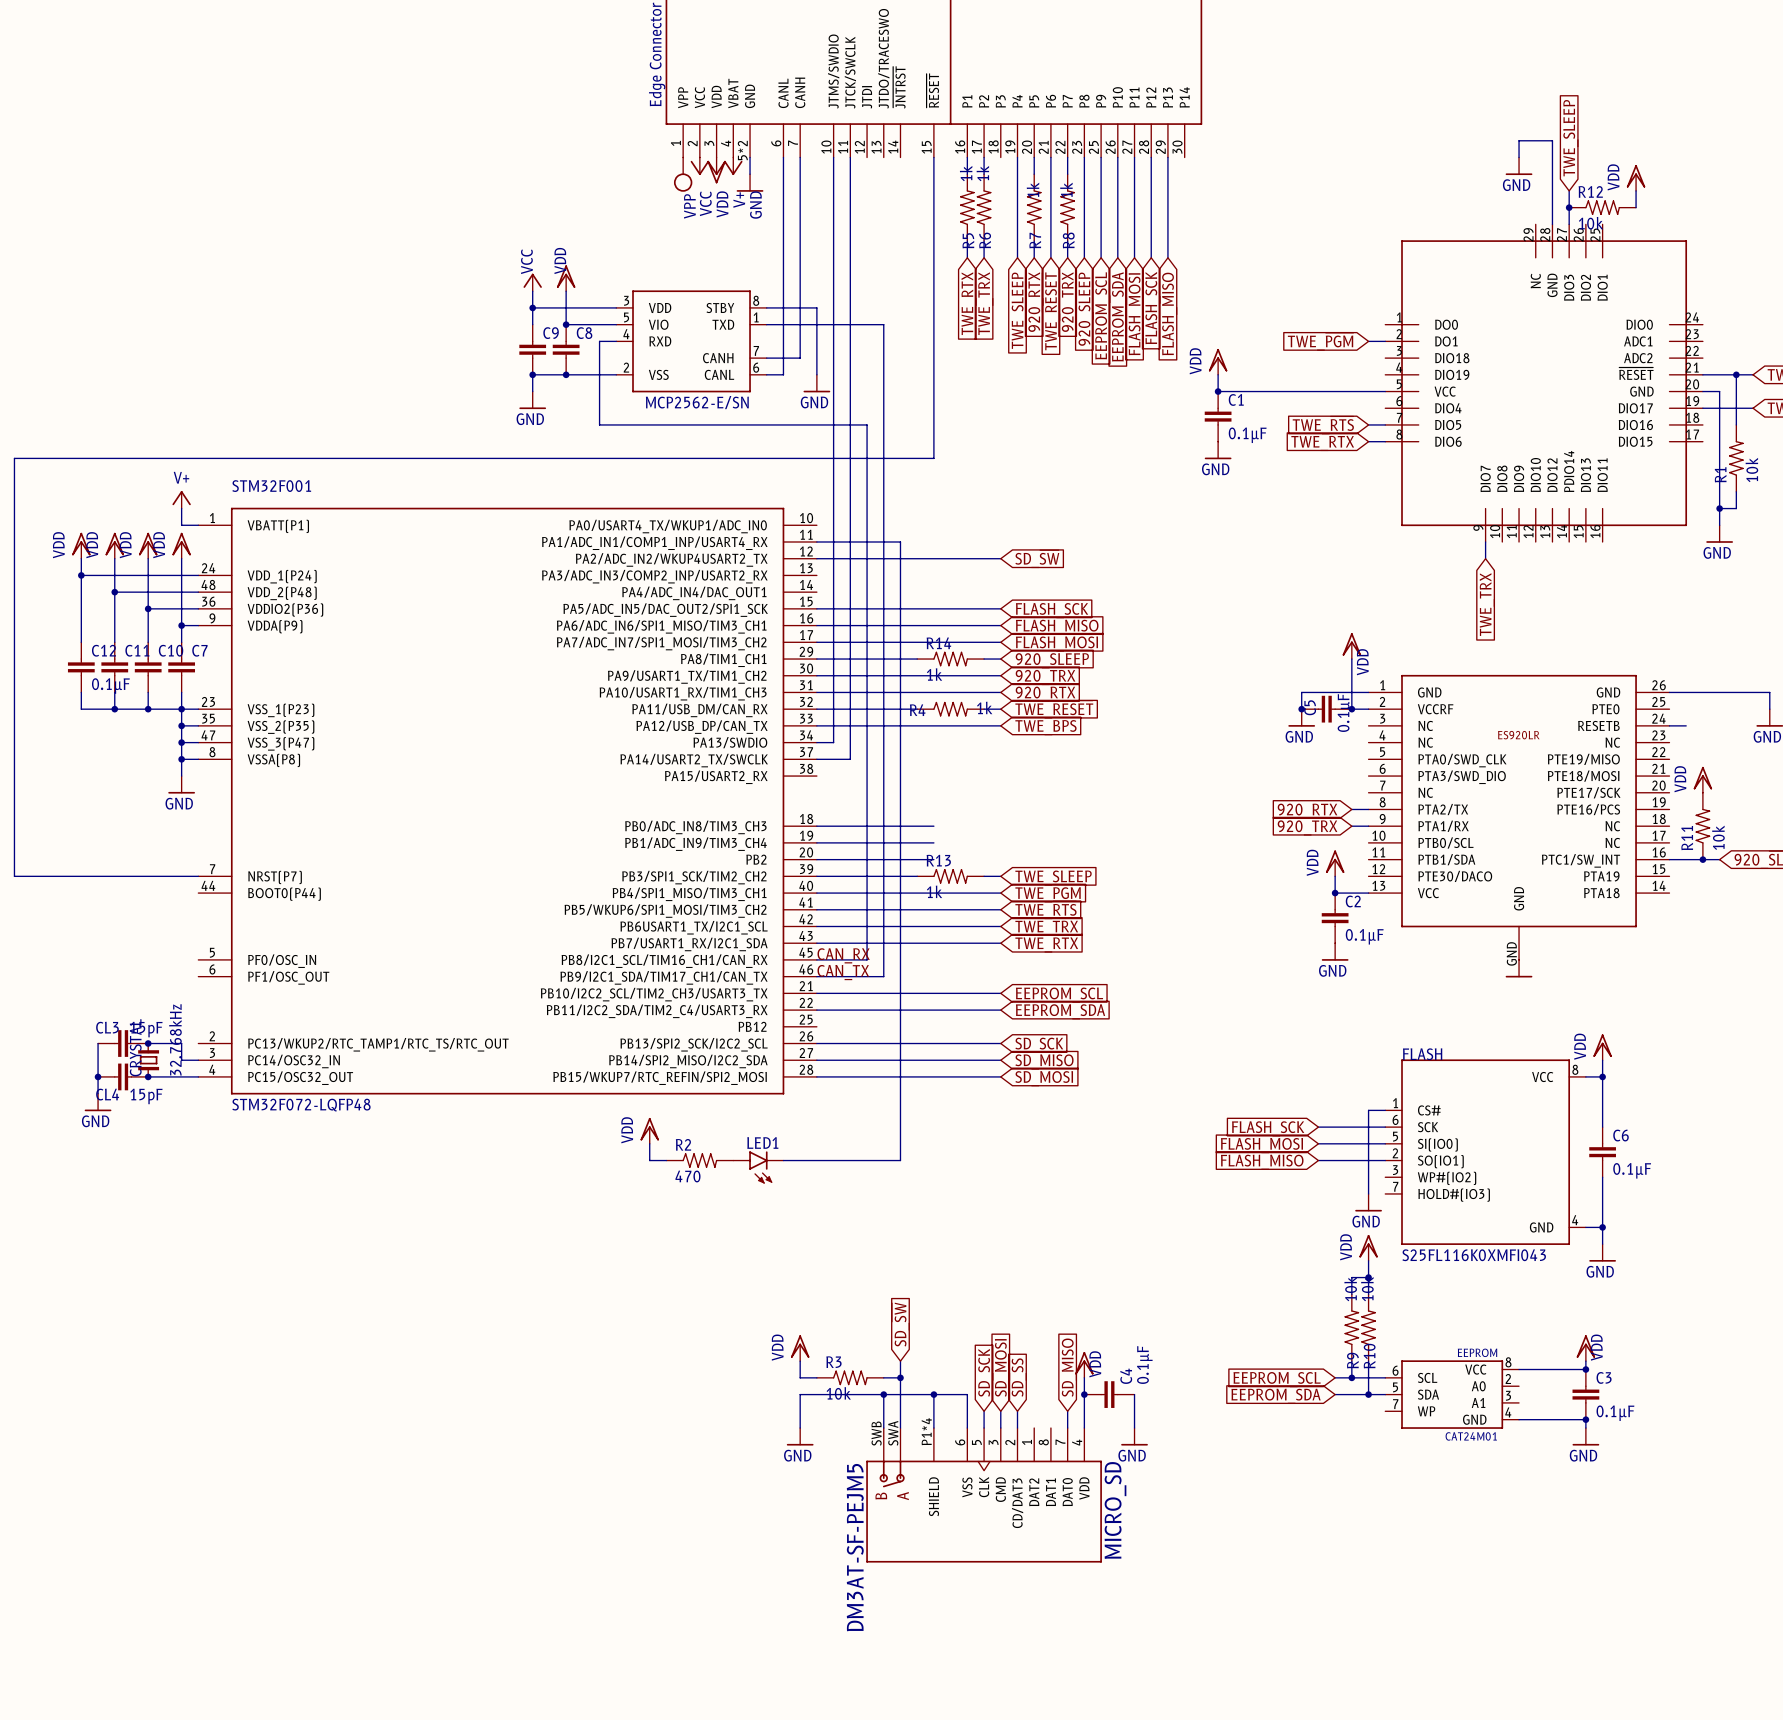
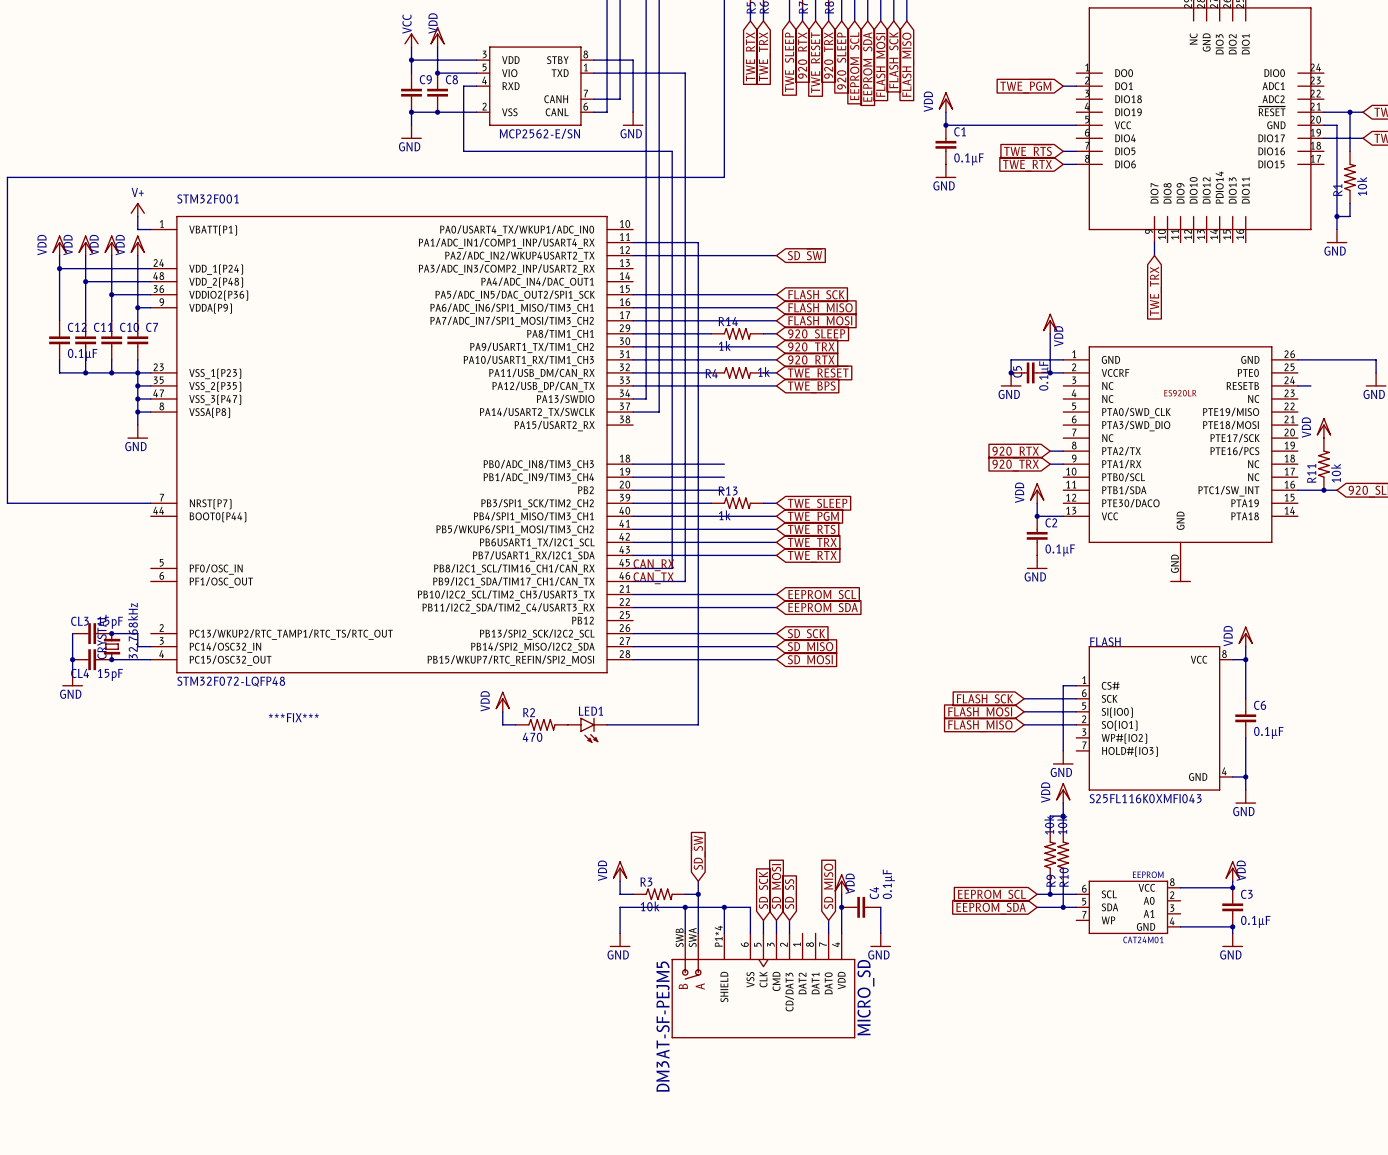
text: none -> ***FIX*** (293, 717)

